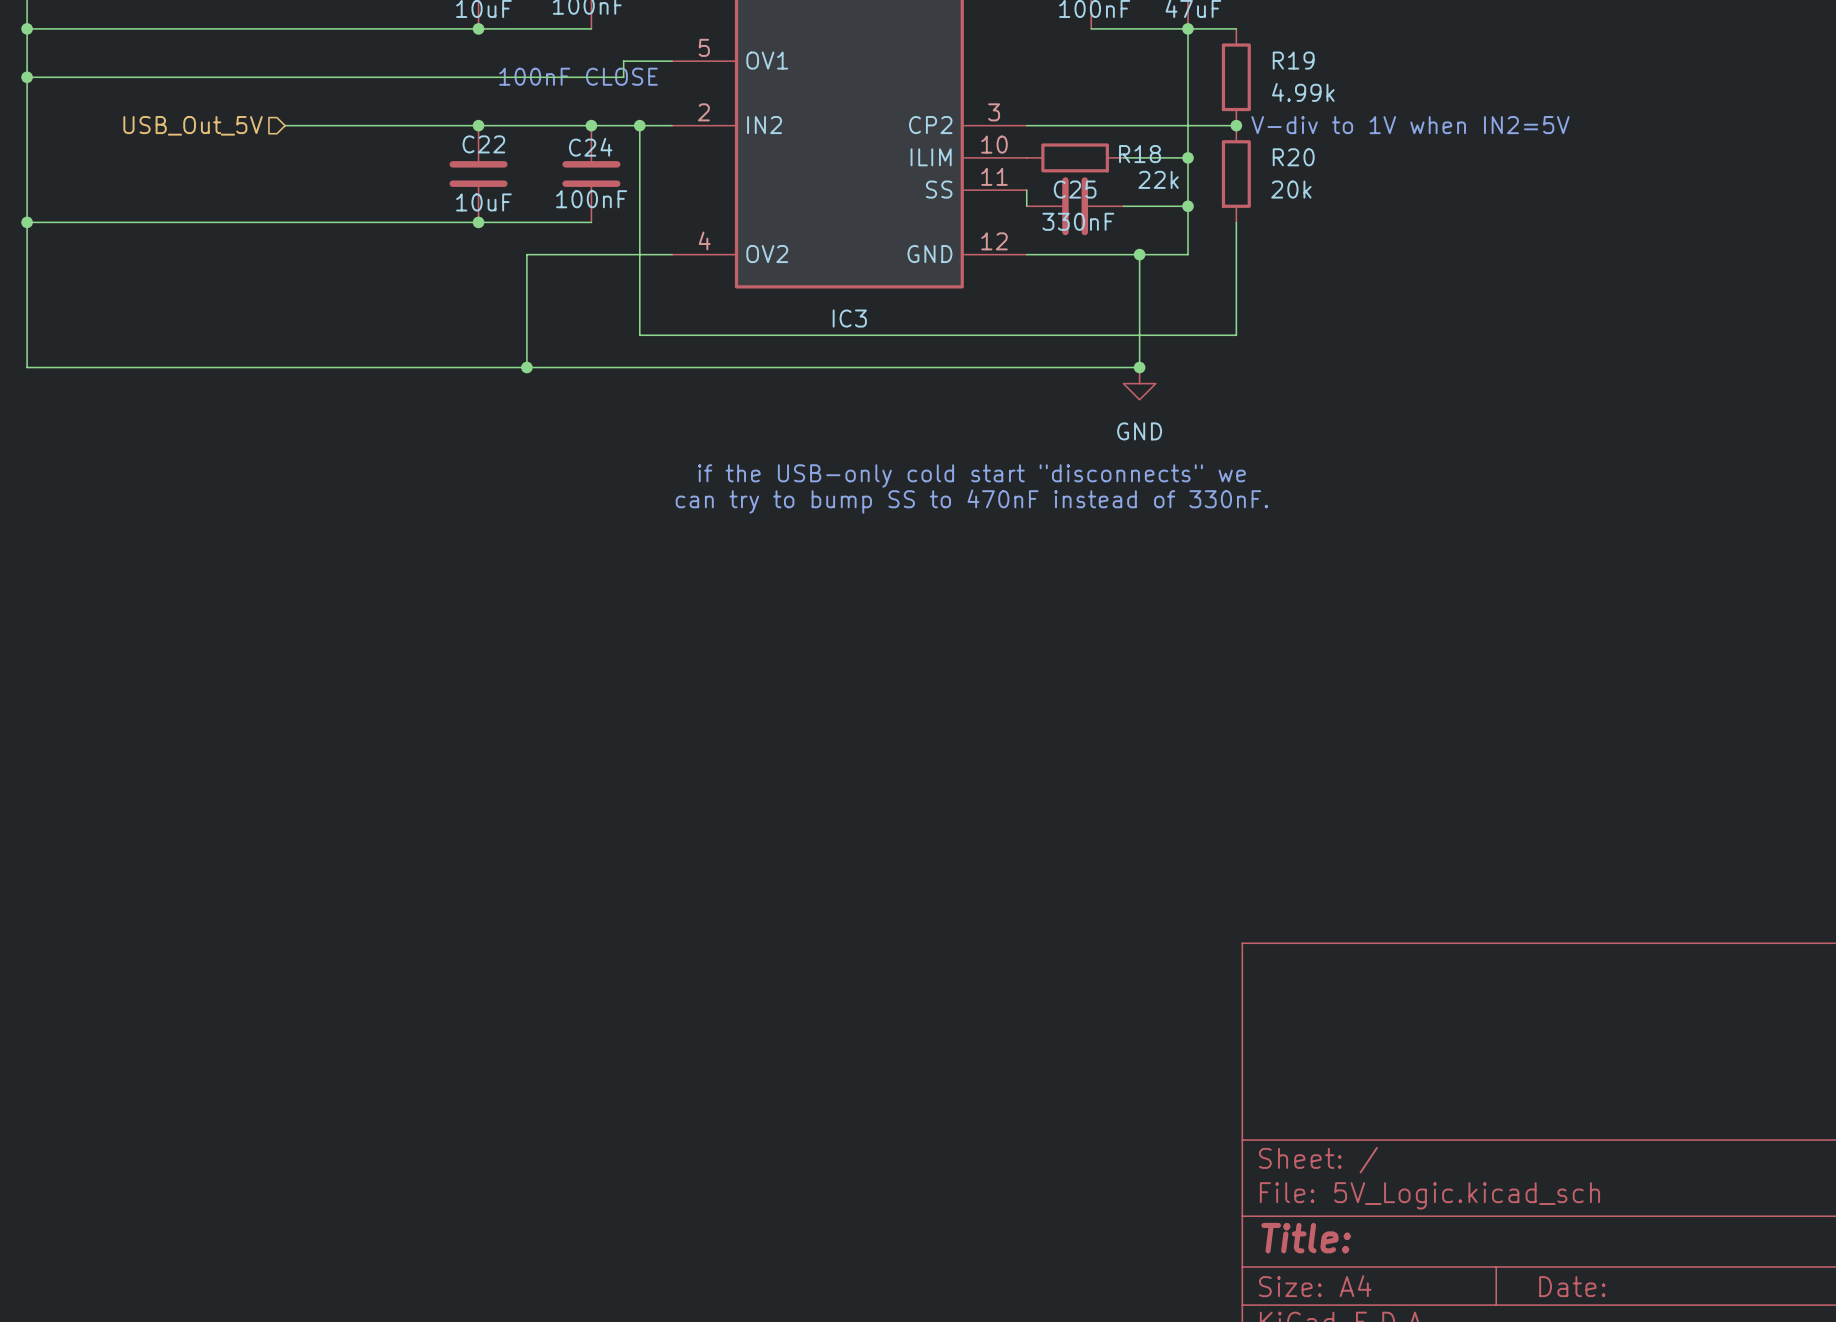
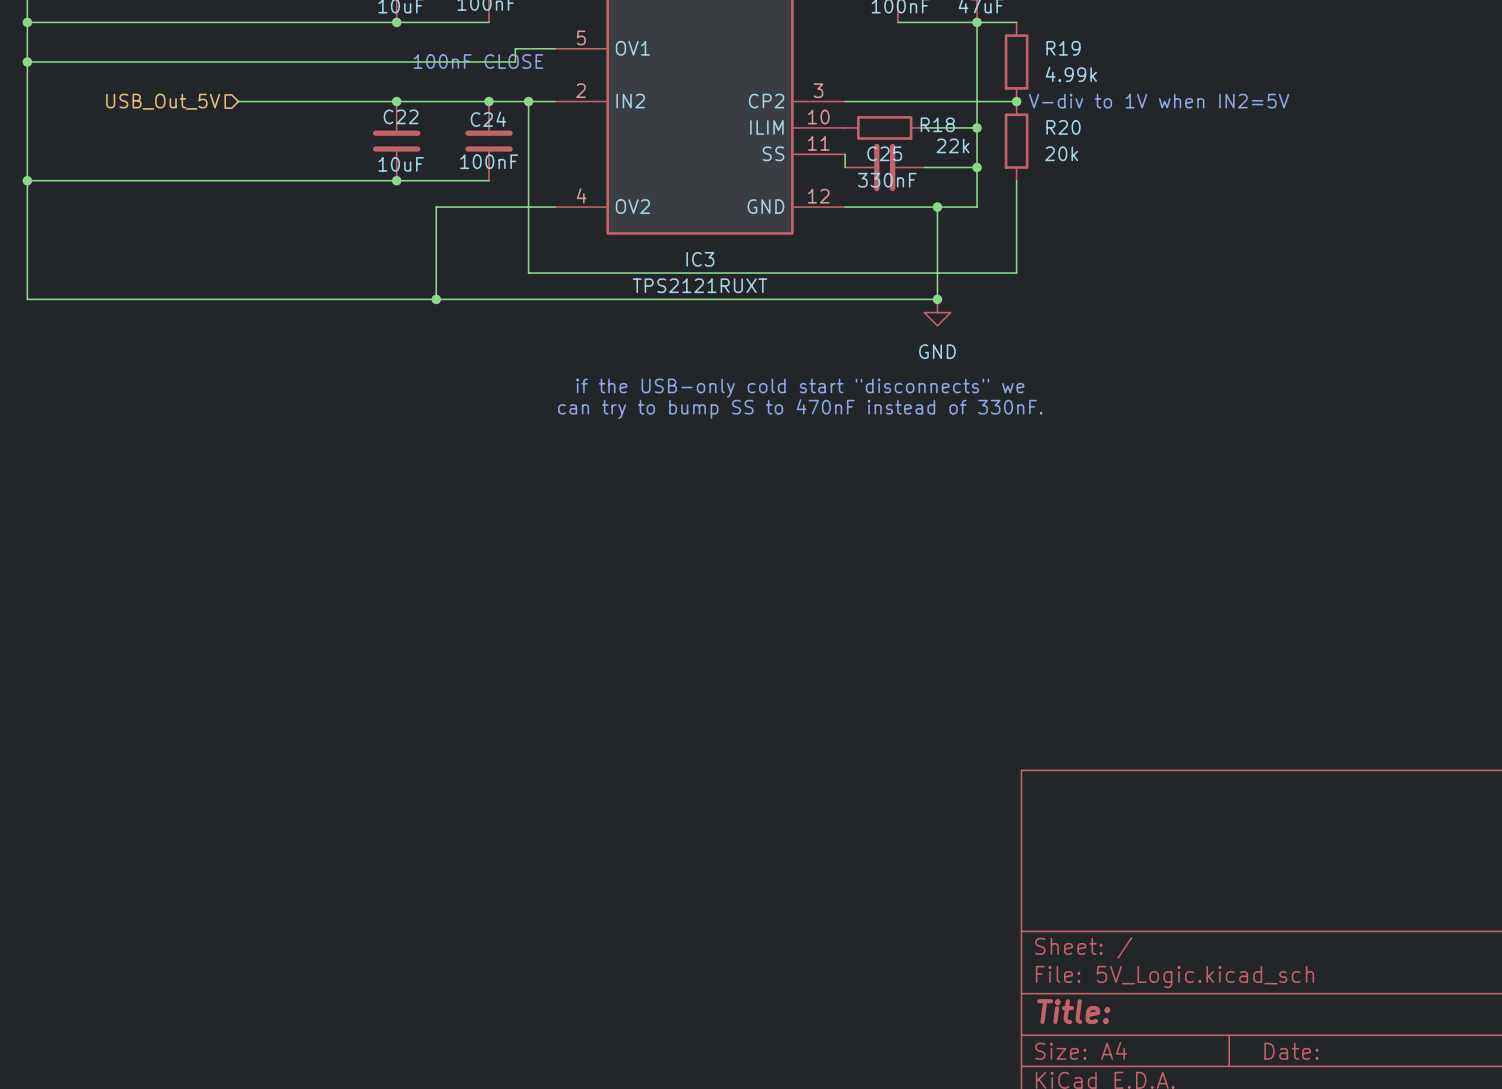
IC3 value: none -> TPS2121RUXT (700, 285)

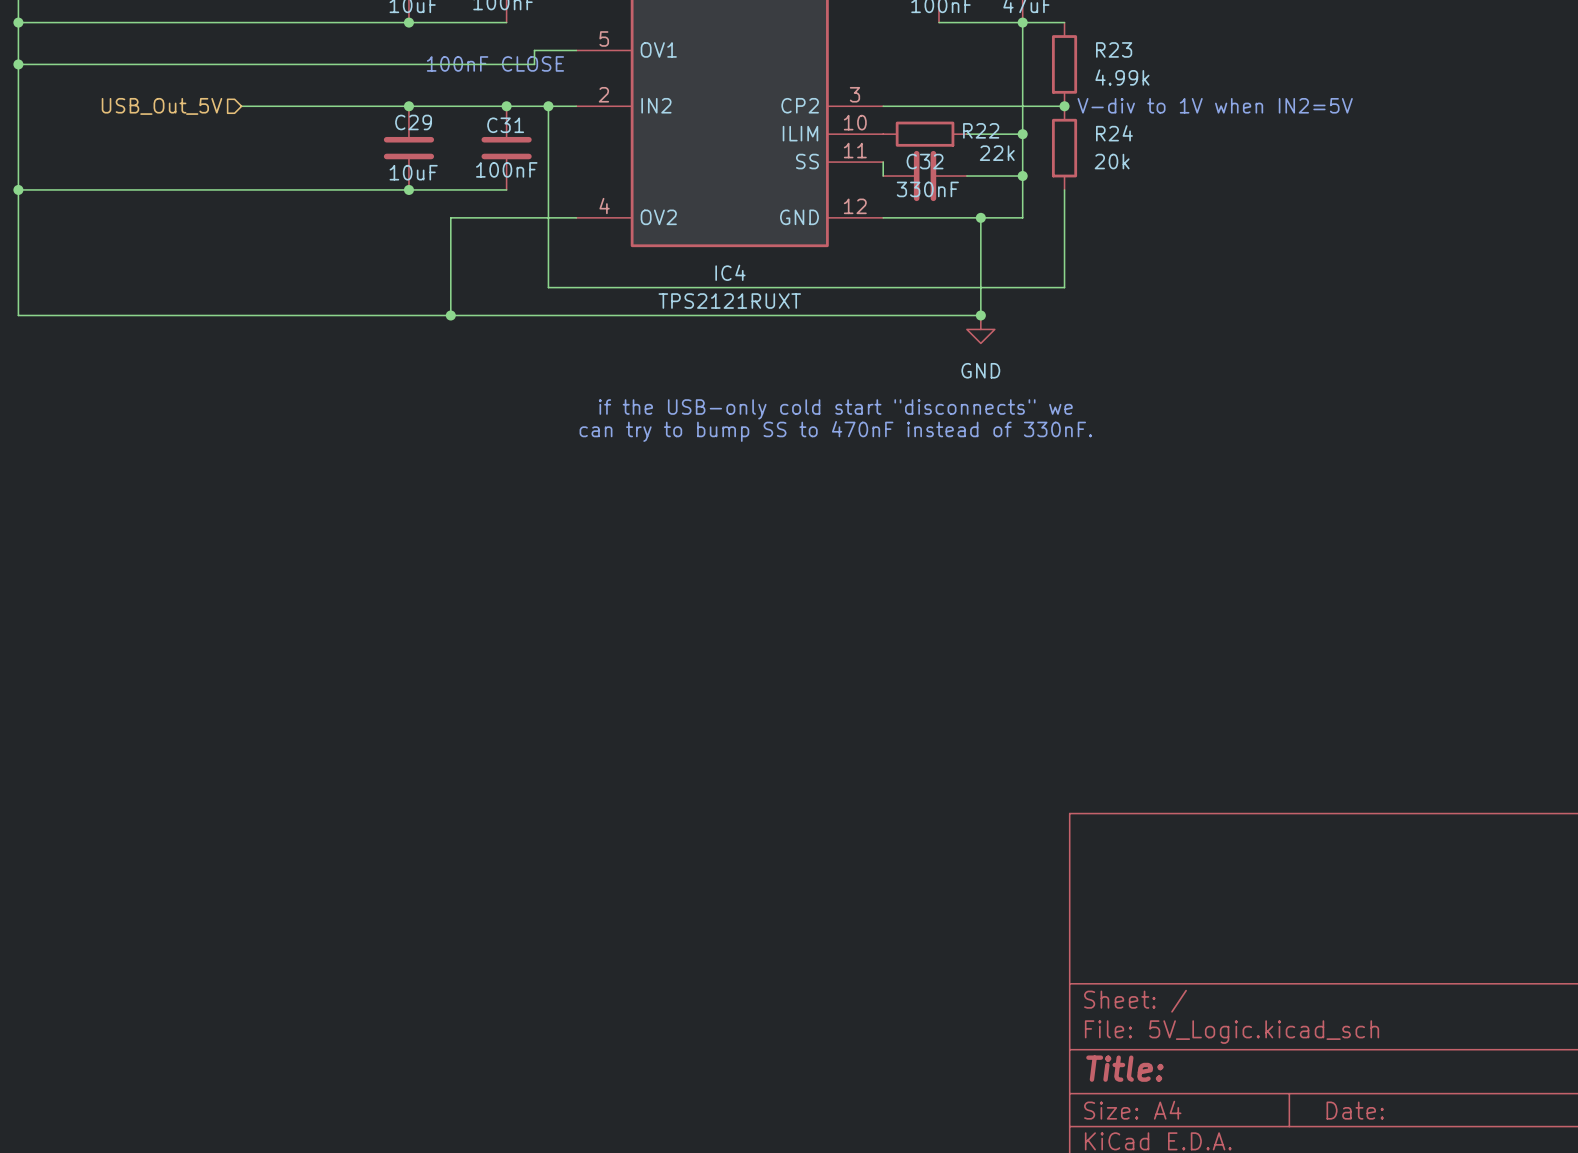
R19 name: R19 (1063, 48) -> R23 (1114, 49)
C22 name: C22 (401, 116) -> C29 (413, 122)
C24 name: C24 (488, 119) -> C31 (505, 125)
R18 name: R18 (937, 124) -> R22 (981, 130)
R20 name: R20 (1063, 127) -> R24 (1114, 133)
C25 name: C25 (884, 153) -> C32 (925, 161)
IC3 name: IC3 (700, 259) -> IC4 (730, 272)

